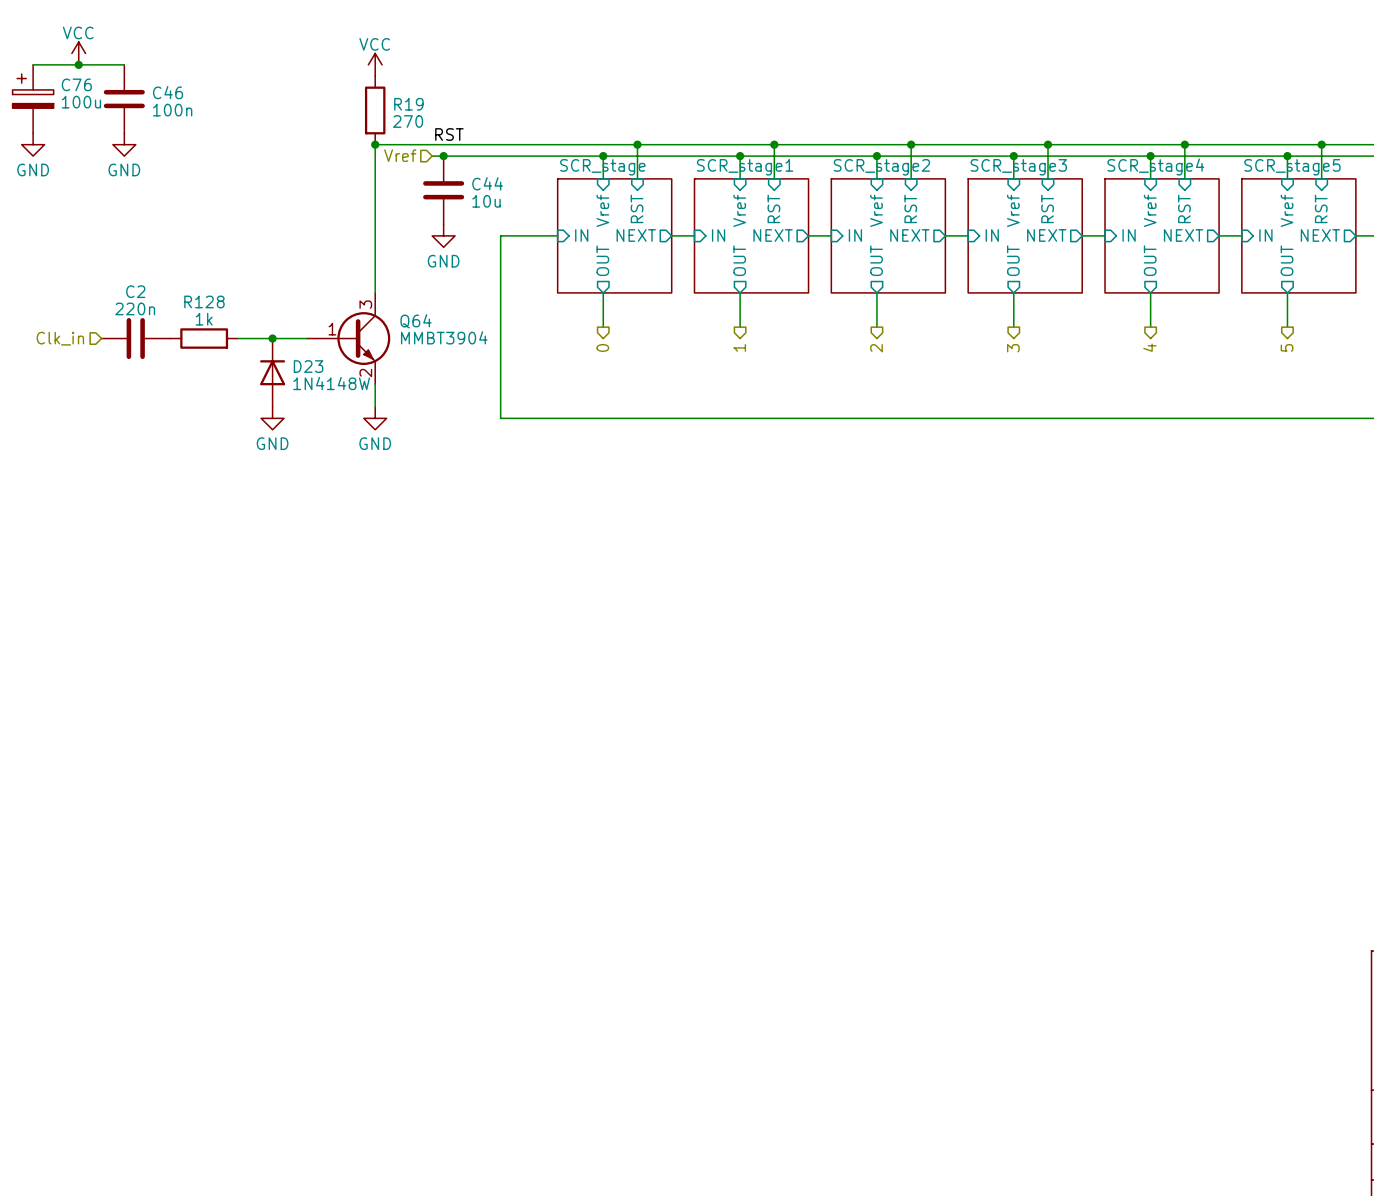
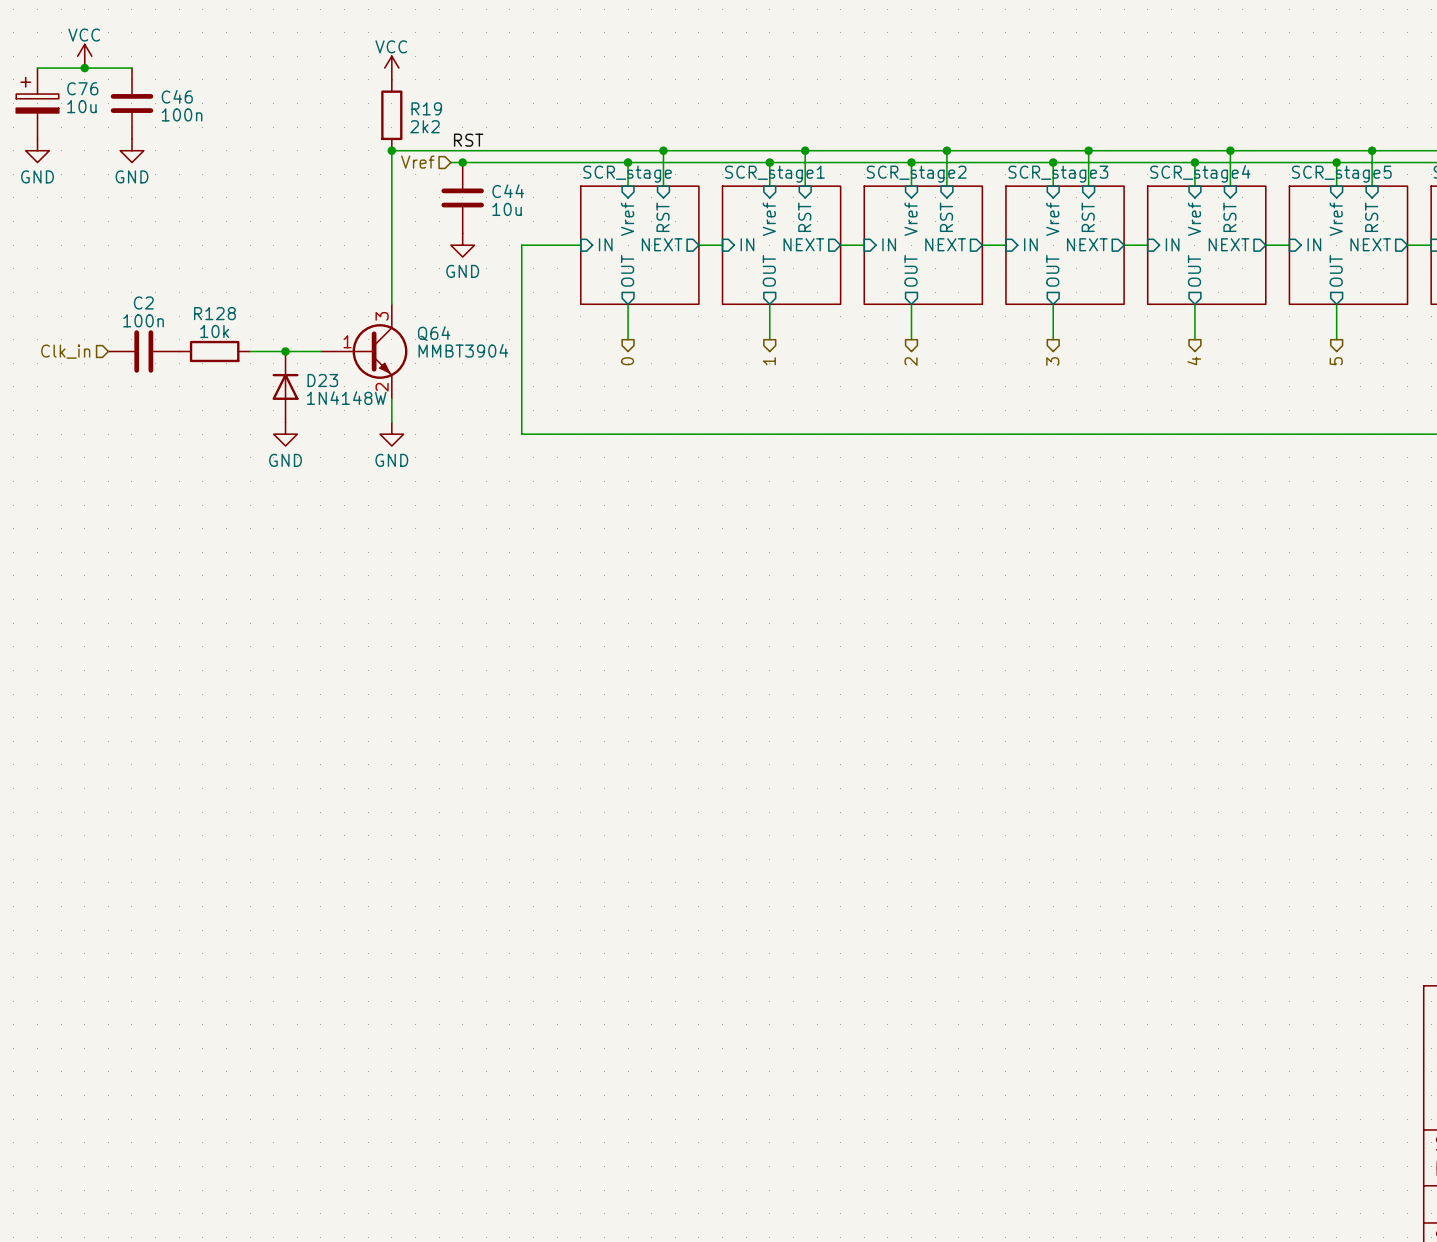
C76 value: 100u (81, 102) -> 10u (81, 106)
R19 value: 270 (408, 121) -> 2k2 (425, 126)
C2 value: 220n (135, 308) -> 100n (143, 320)
R128 value: 1k (204, 319) -> 10k (214, 331)

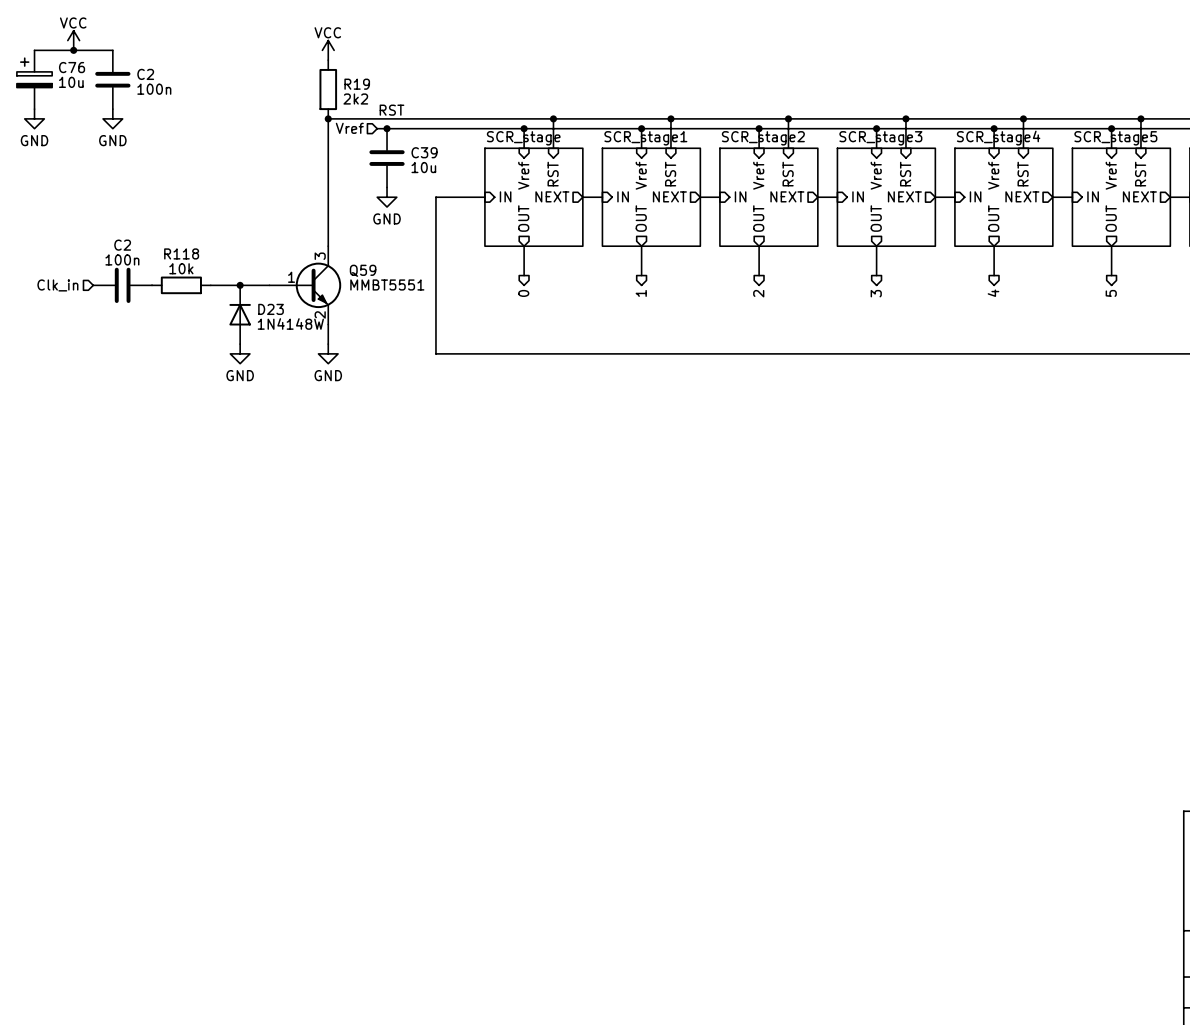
C46 name: C46 (177, 96) -> C2 (145, 74)
C44 name: C44 (508, 191) -> C39 (424, 152)
R128 name: R128 (214, 313) -> R118 (181, 253)
Q64 name: Q64 (434, 333) -> Q59 (363, 270)
Q64 value: MMBT3904 (463, 350) -> MMBT5551 (387, 284)

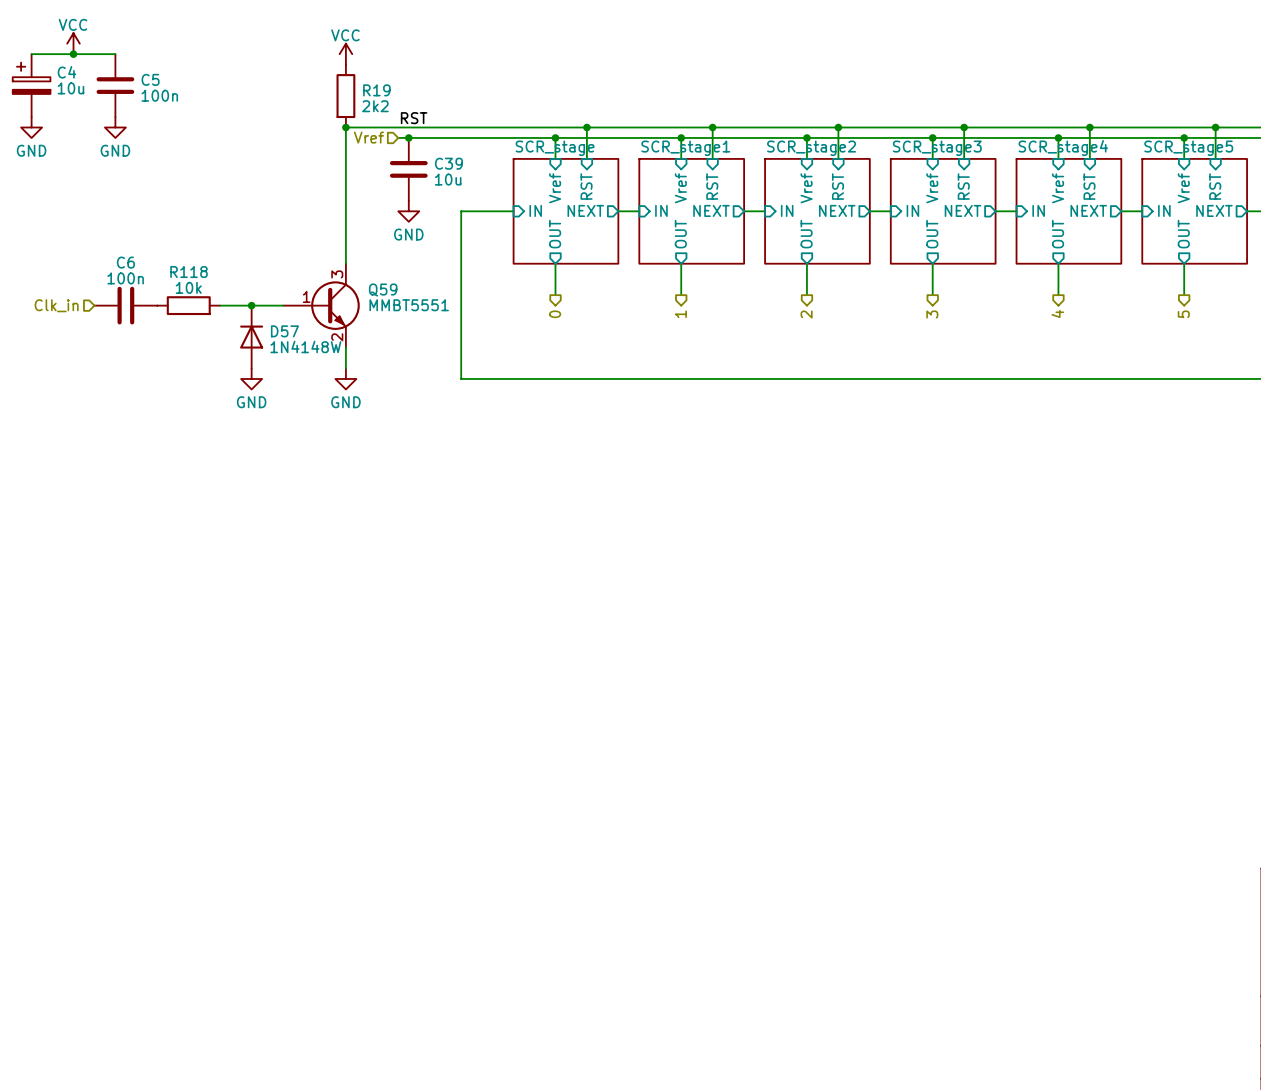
C76 name: C76 (72, 67) -> C4 (66, 72)
C2 name: C2 (145, 74) -> C5 (150, 79)
C2 name: C2 (122, 245) -> C6 (125, 262)
D23 name: D23 (271, 309) -> D57 (284, 331)

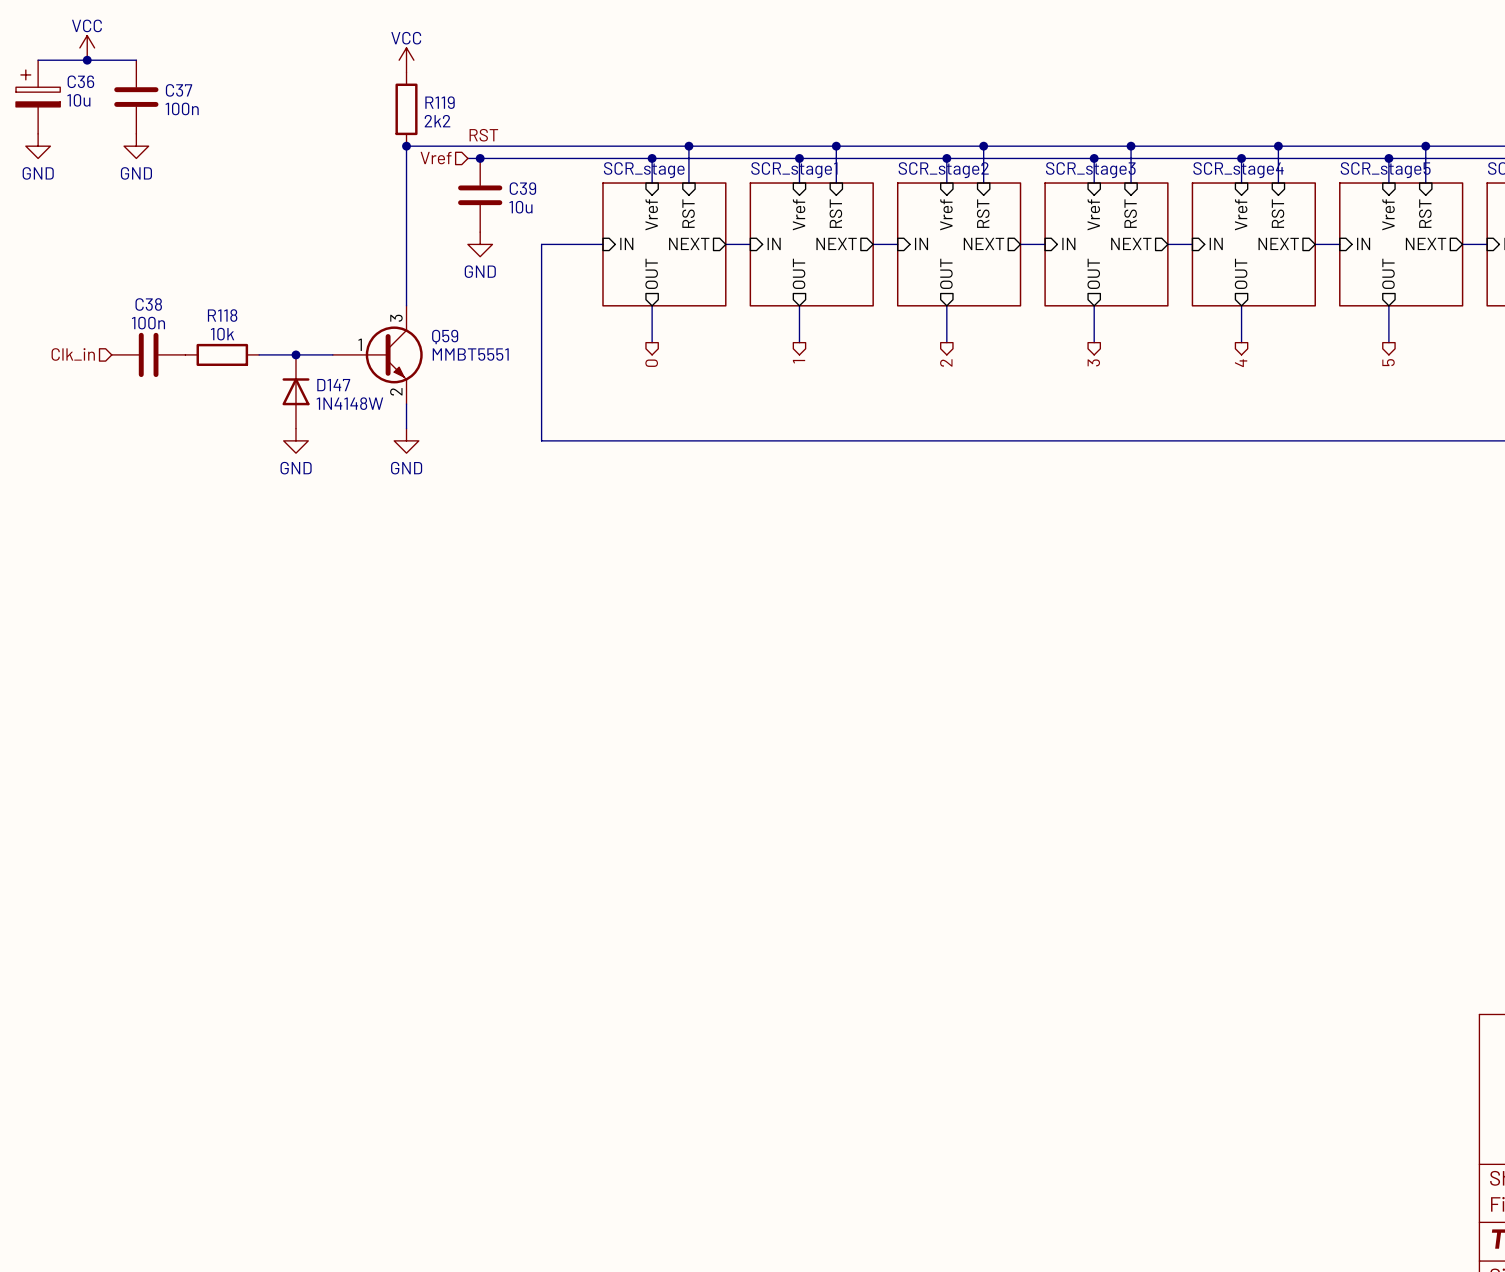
C4 name: C4 (66, 72) -> C36 (80, 81)
C5 name: C5 (150, 79) -> C37 (179, 90)
R19 name: R19 (376, 90) -> R119 (440, 102)
C6 name: C6 (125, 262) -> C38 (148, 304)
D57 name: D57 (284, 331) -> D147 (333, 385)

